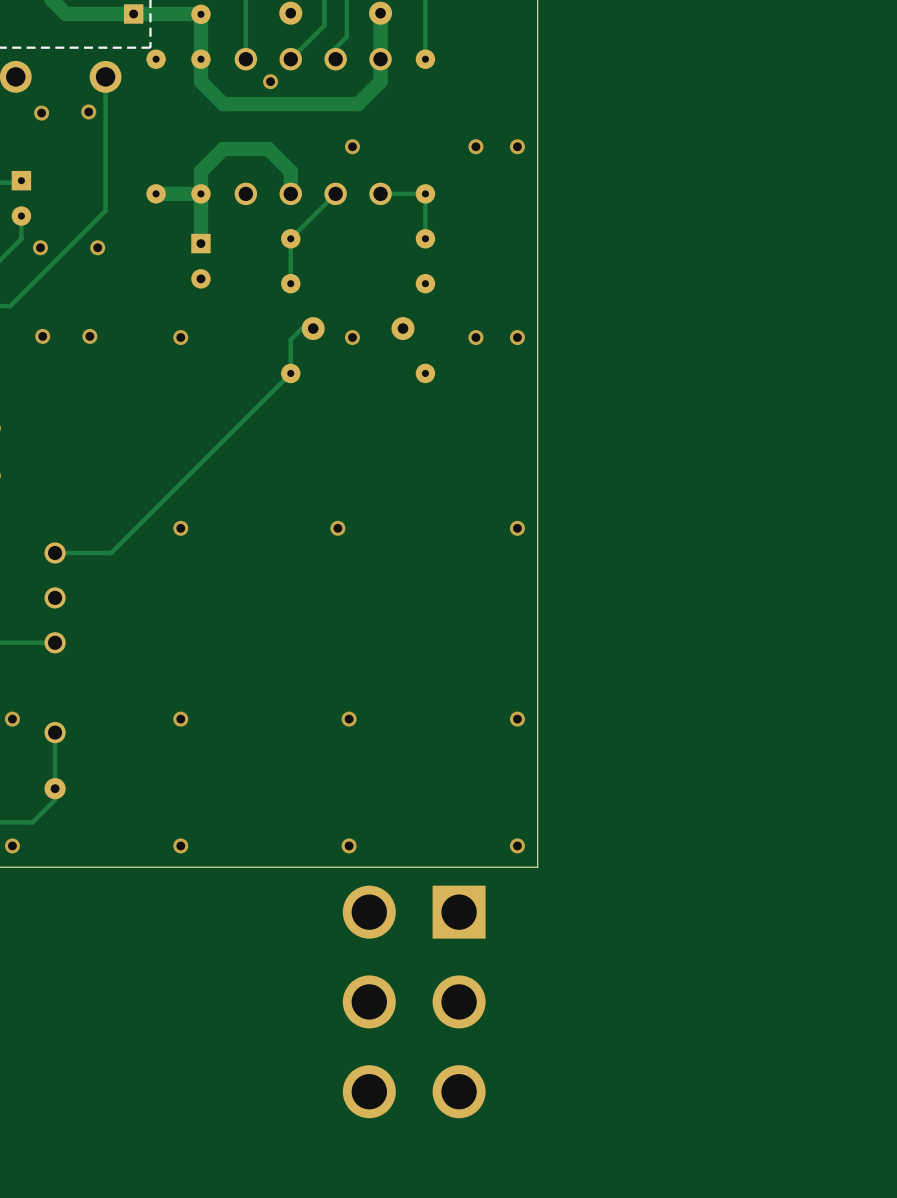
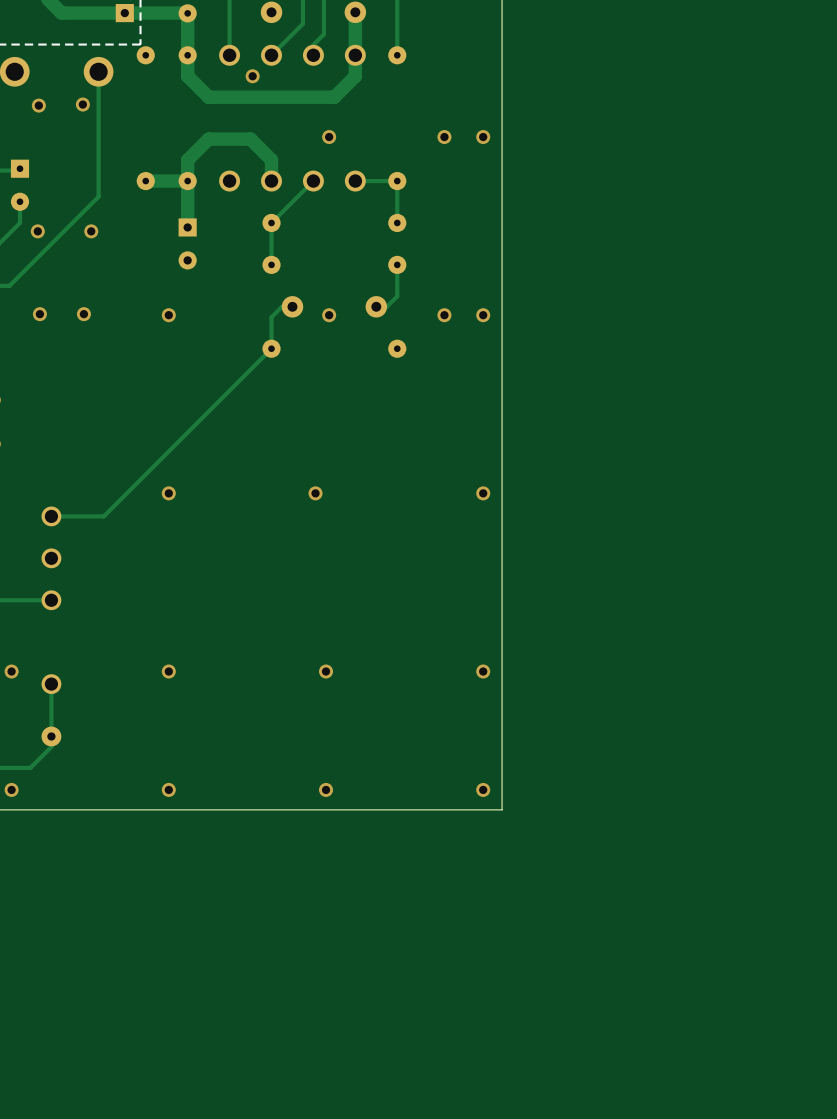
track: none -> (397, 264) (397, 296) (386, 306) (376, 306)
part: (414, 1001) -> none

